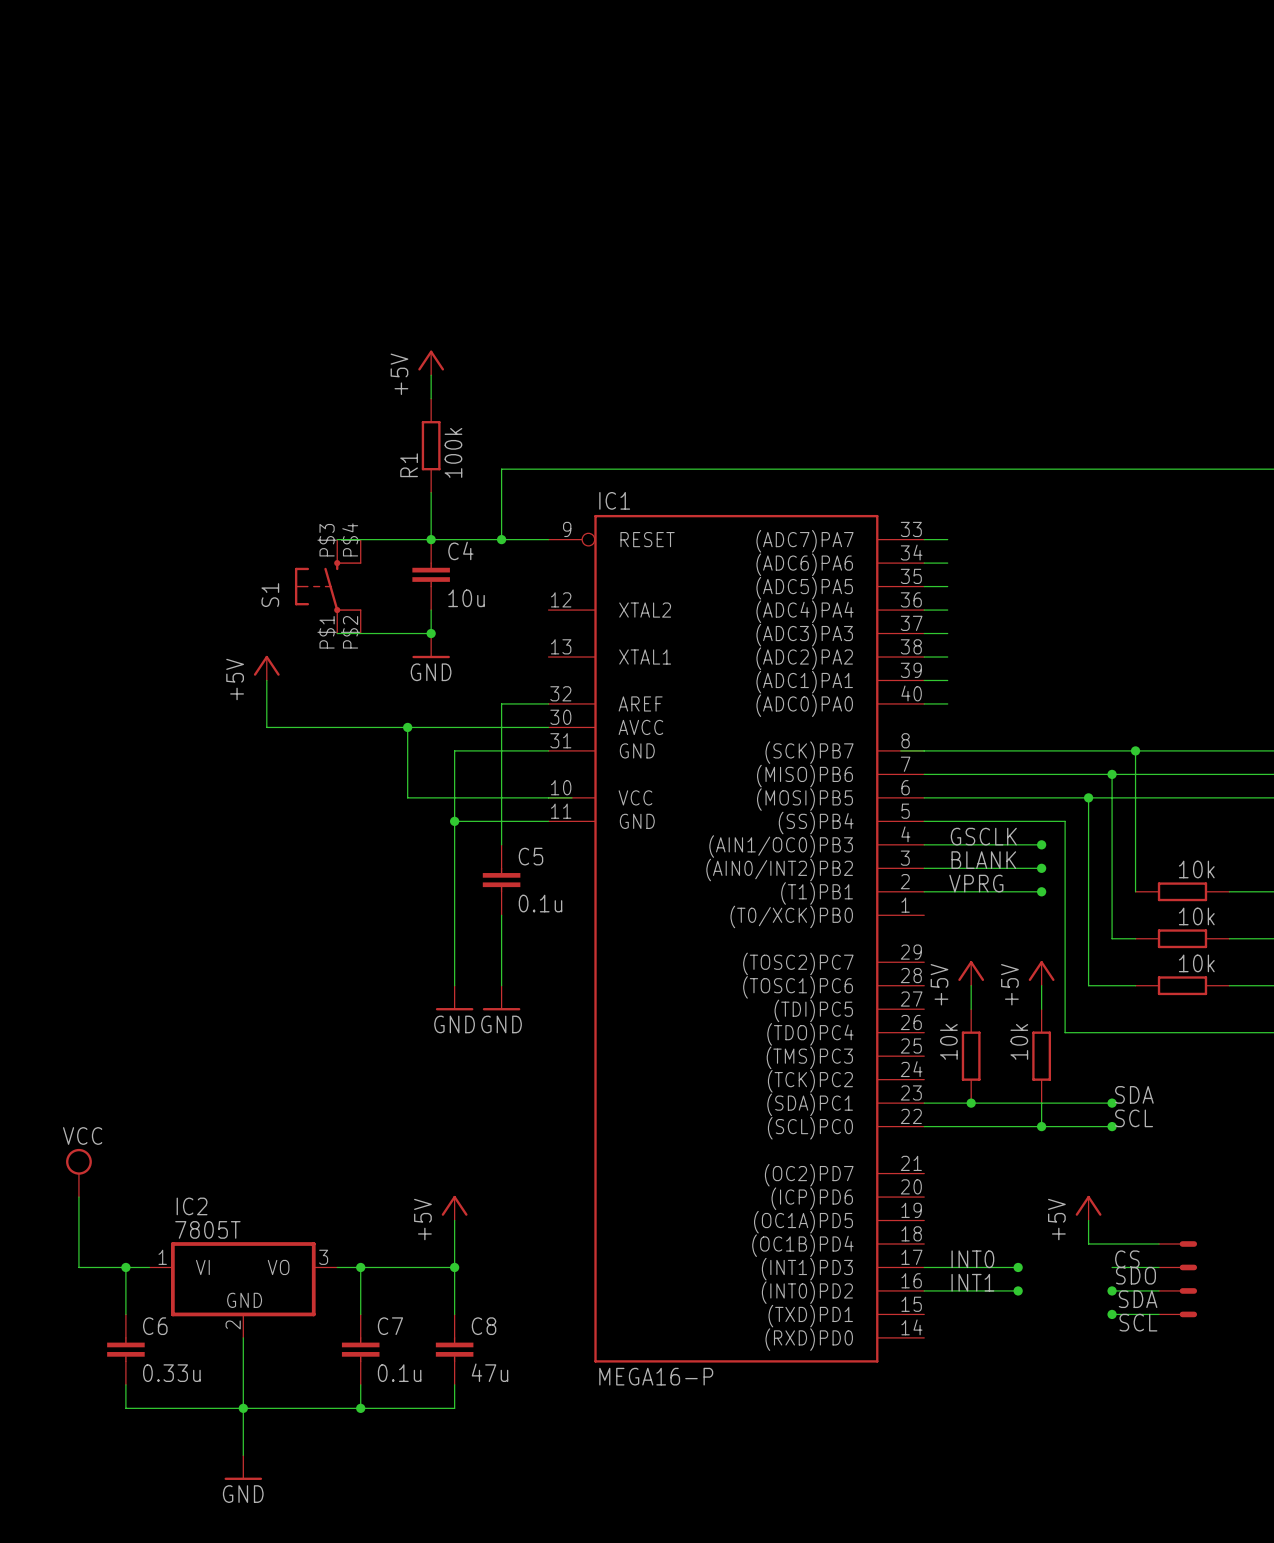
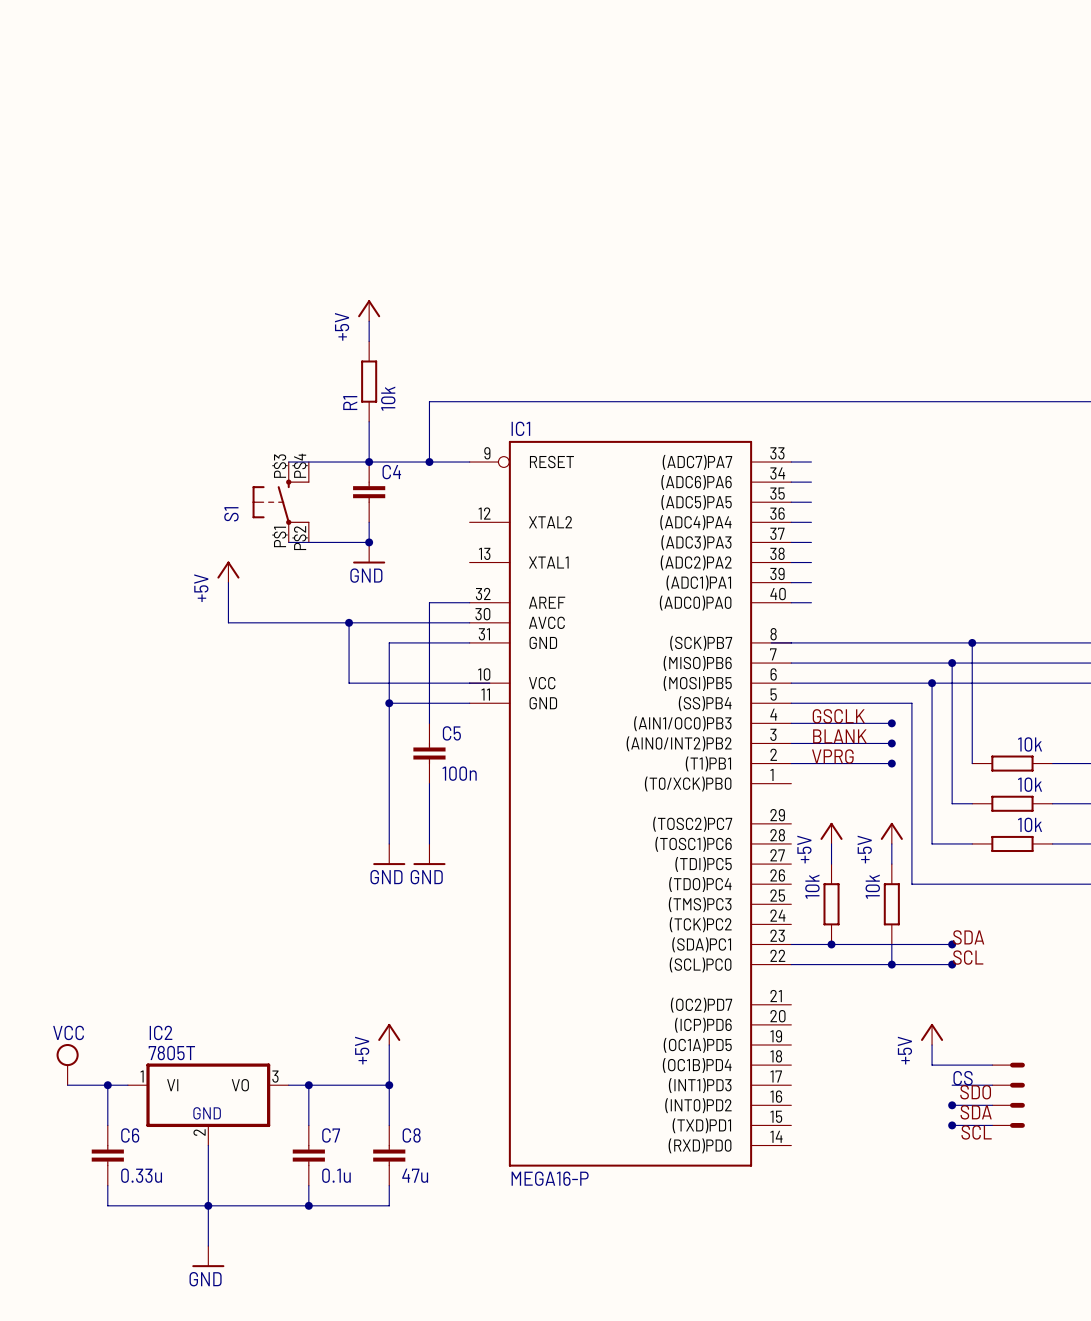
R1 value: 100k (453, 452) -> 10k (388, 398)
C4 value: 10u (466, 598) -> none
C5 value: 0.1u (540, 903) -> 100n (459, 773)
power symbol position: VCC (78, 1172) -> VCC (67, 1064)
wire: (78, 1197) (78, 1267) -> none
label: INT0 (972, 1259) -> none
wire: (924, 1267) (1018, 1267) -> none
junction: (1018, 1267) -> none
label: INT1 (972, 1282) -> none
wire: (924, 1290) (1018, 1290) -> none
junction: (1018, 1290) -> none

